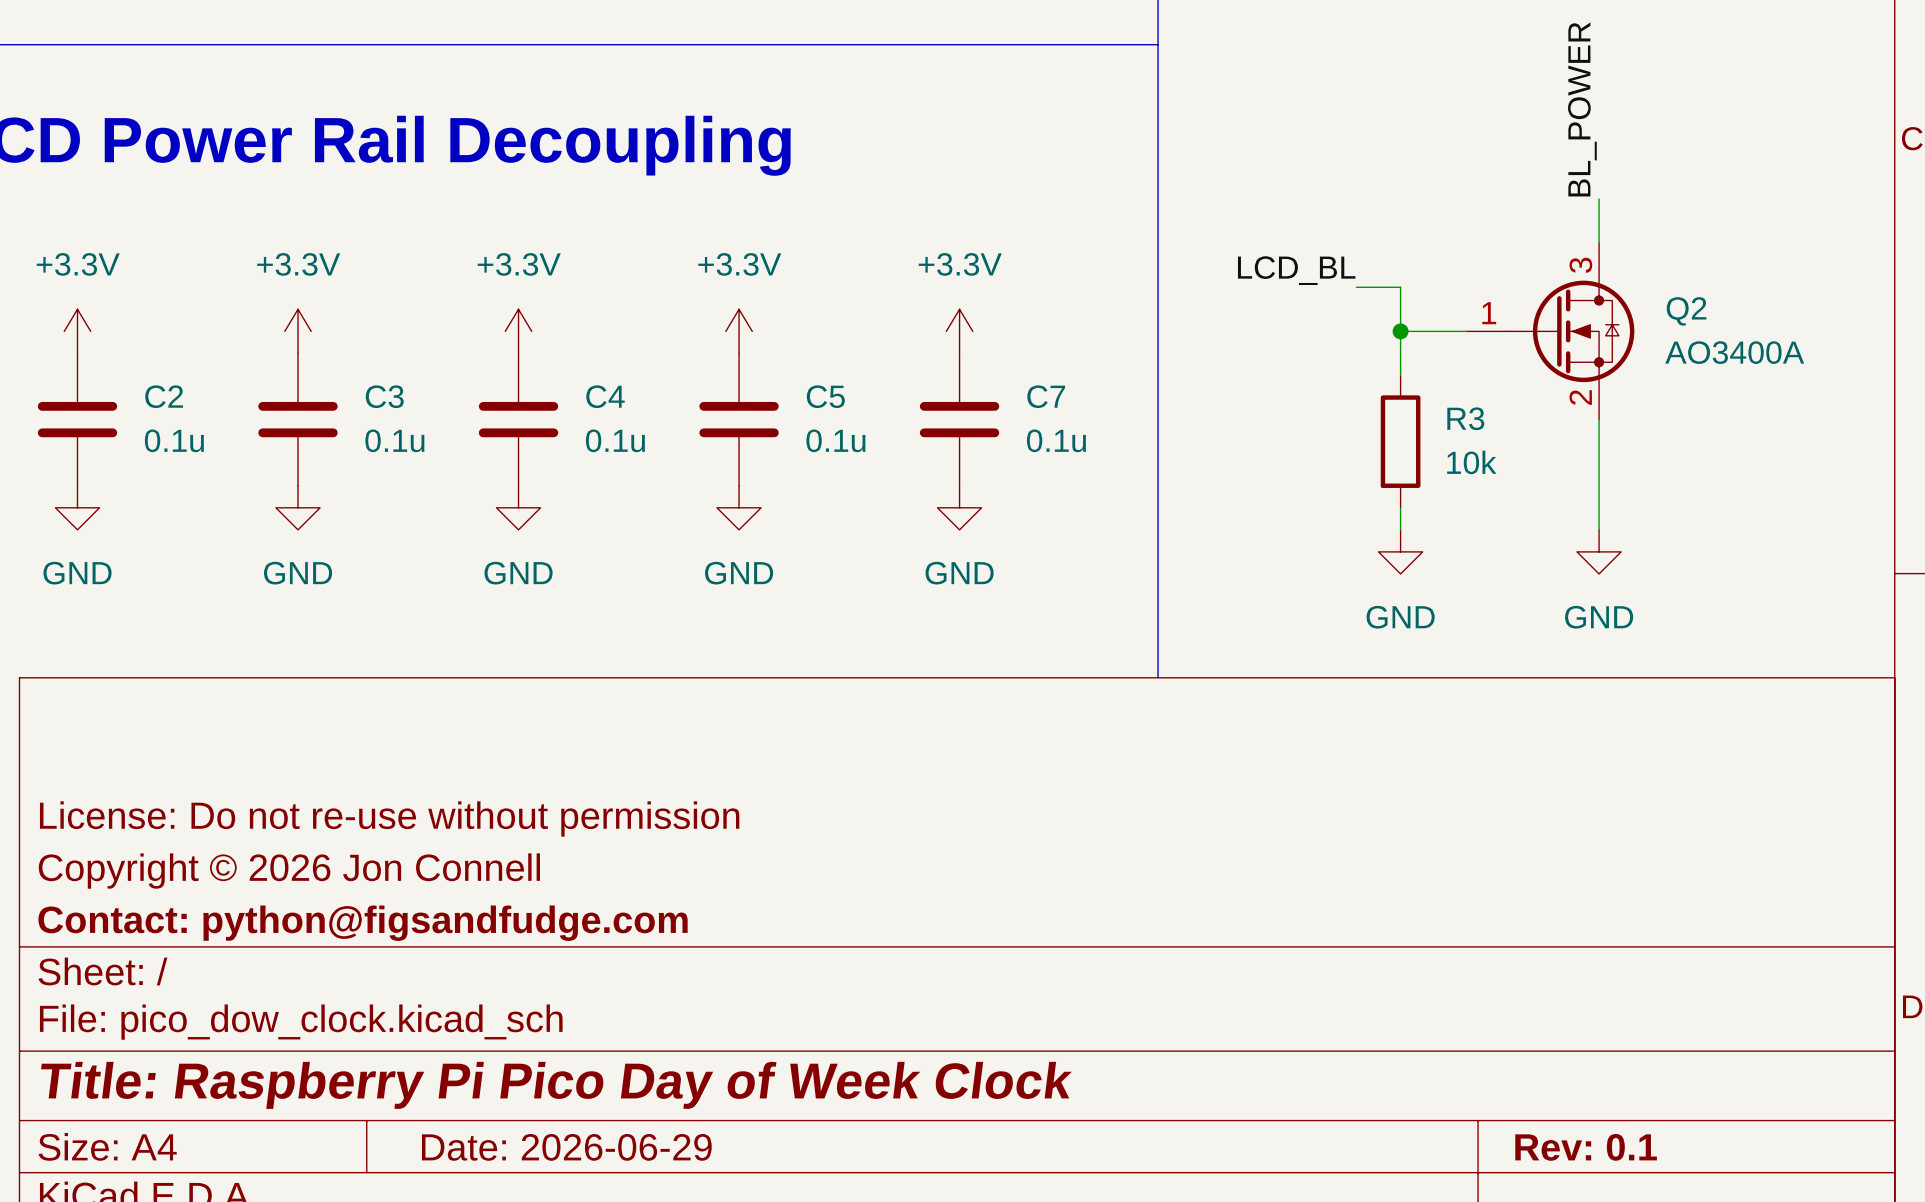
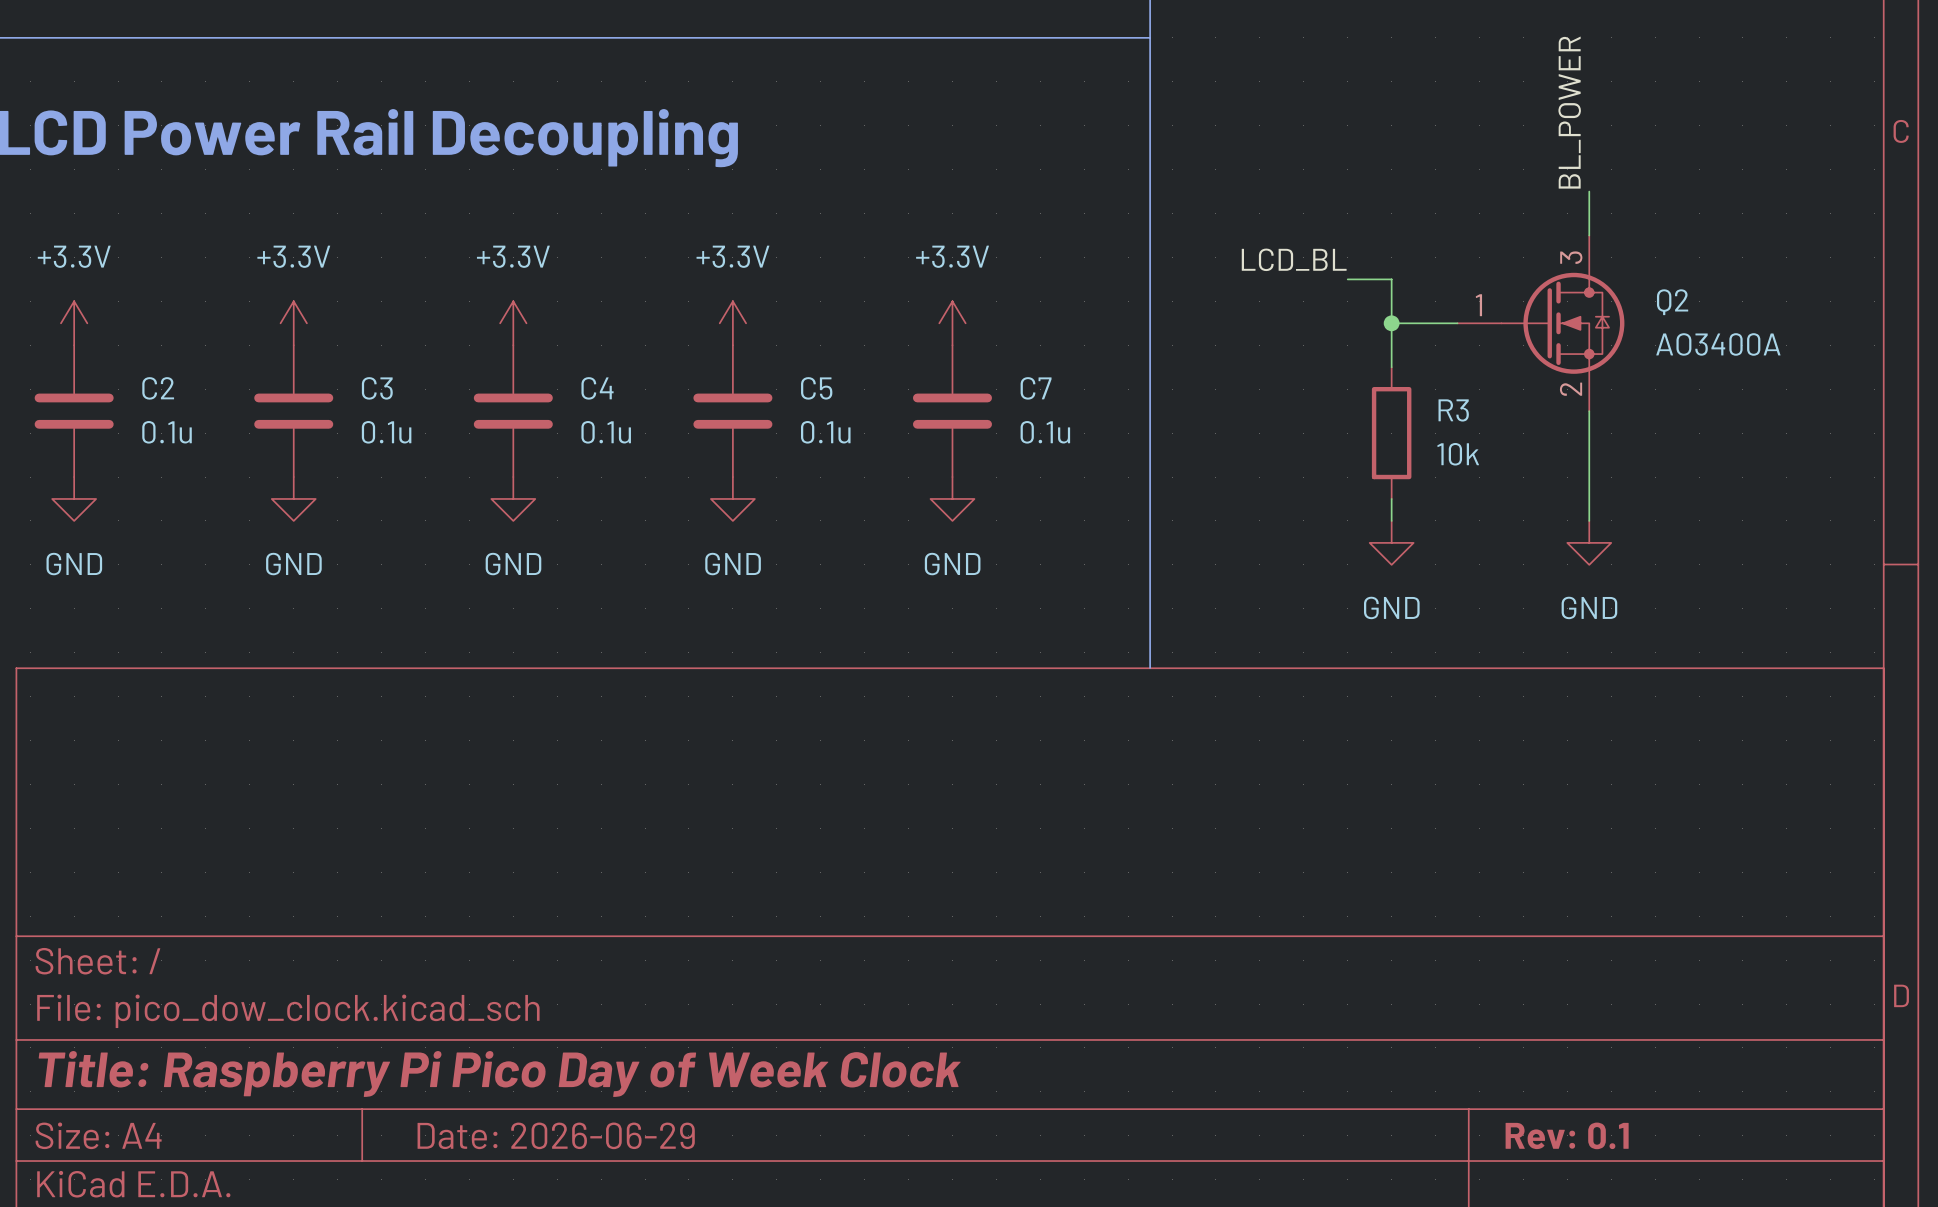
title block: License: Do not re-use without permission (389, 818) -> none
title block: Copyright © 2026 Jon Connell (289, 871) -> none
title block: Contact: python@figsandfudge.com (363, 923) -> none

